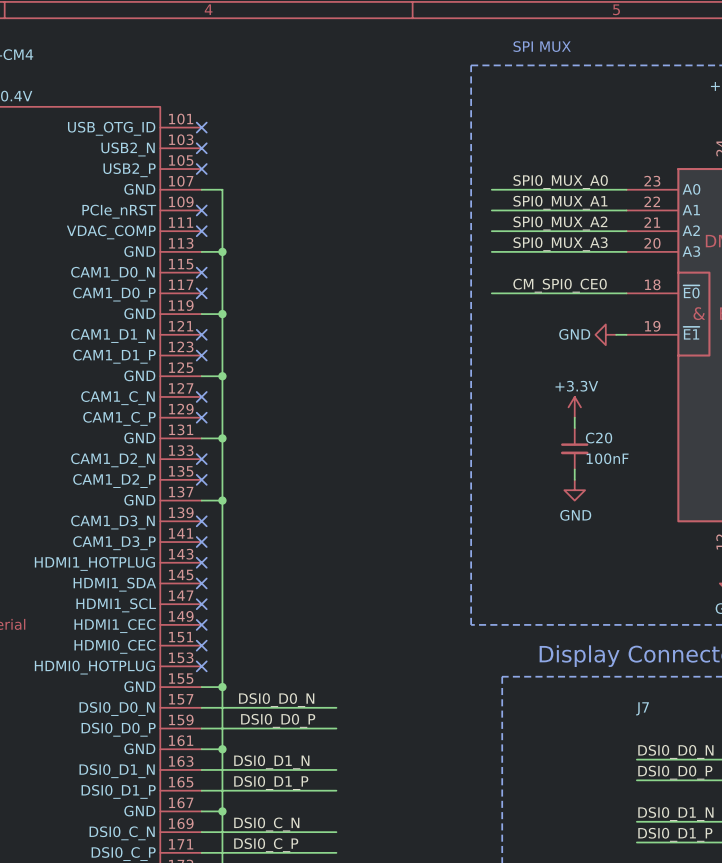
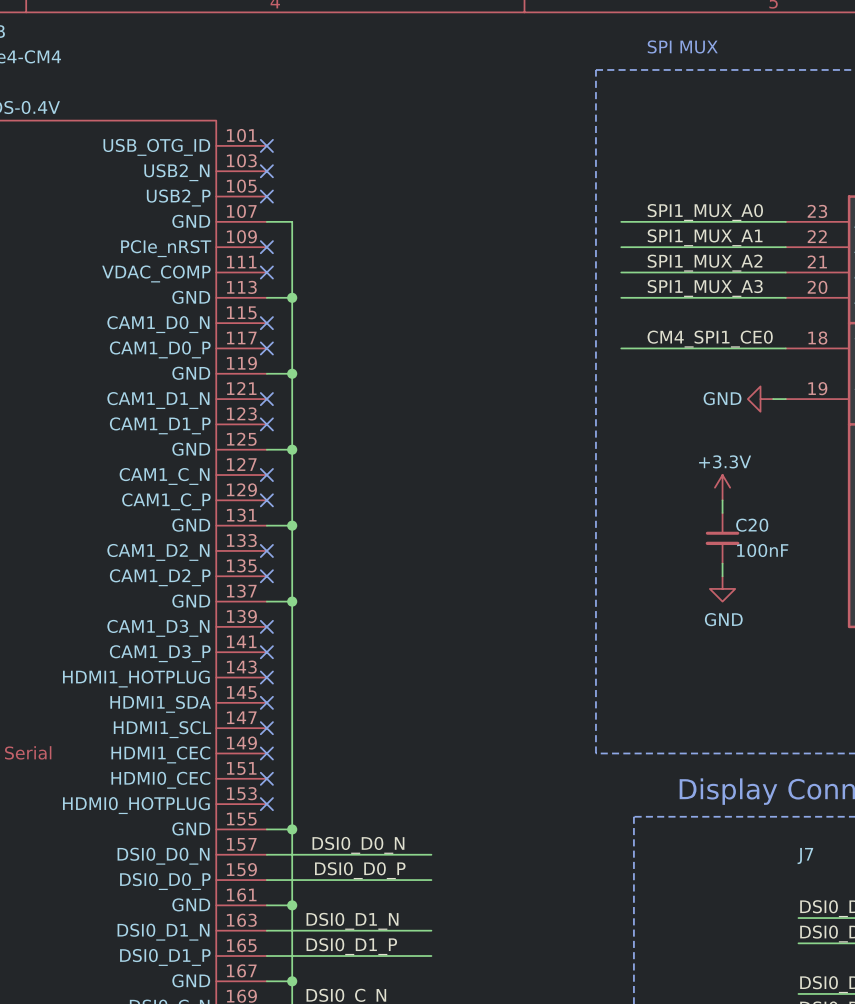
label: SPI0_MUX_A0 (560, 182) -> SPI1_MUX_A0 (705, 212)
label: SPI0_MUX_A1 (560, 202) -> SPI1_MUX_A1 (705, 237)
label: SPI0_MUX_A2 (560, 223) -> SPI1_MUX_A2 (705, 263)
label: SPI0_MUX_A3 (560, 244) -> SPI1_MUX_A3 (705, 288)
label: CM_SPI0_CE0 (560, 285) -> CM4_SPI1_CE0 (710, 339)

